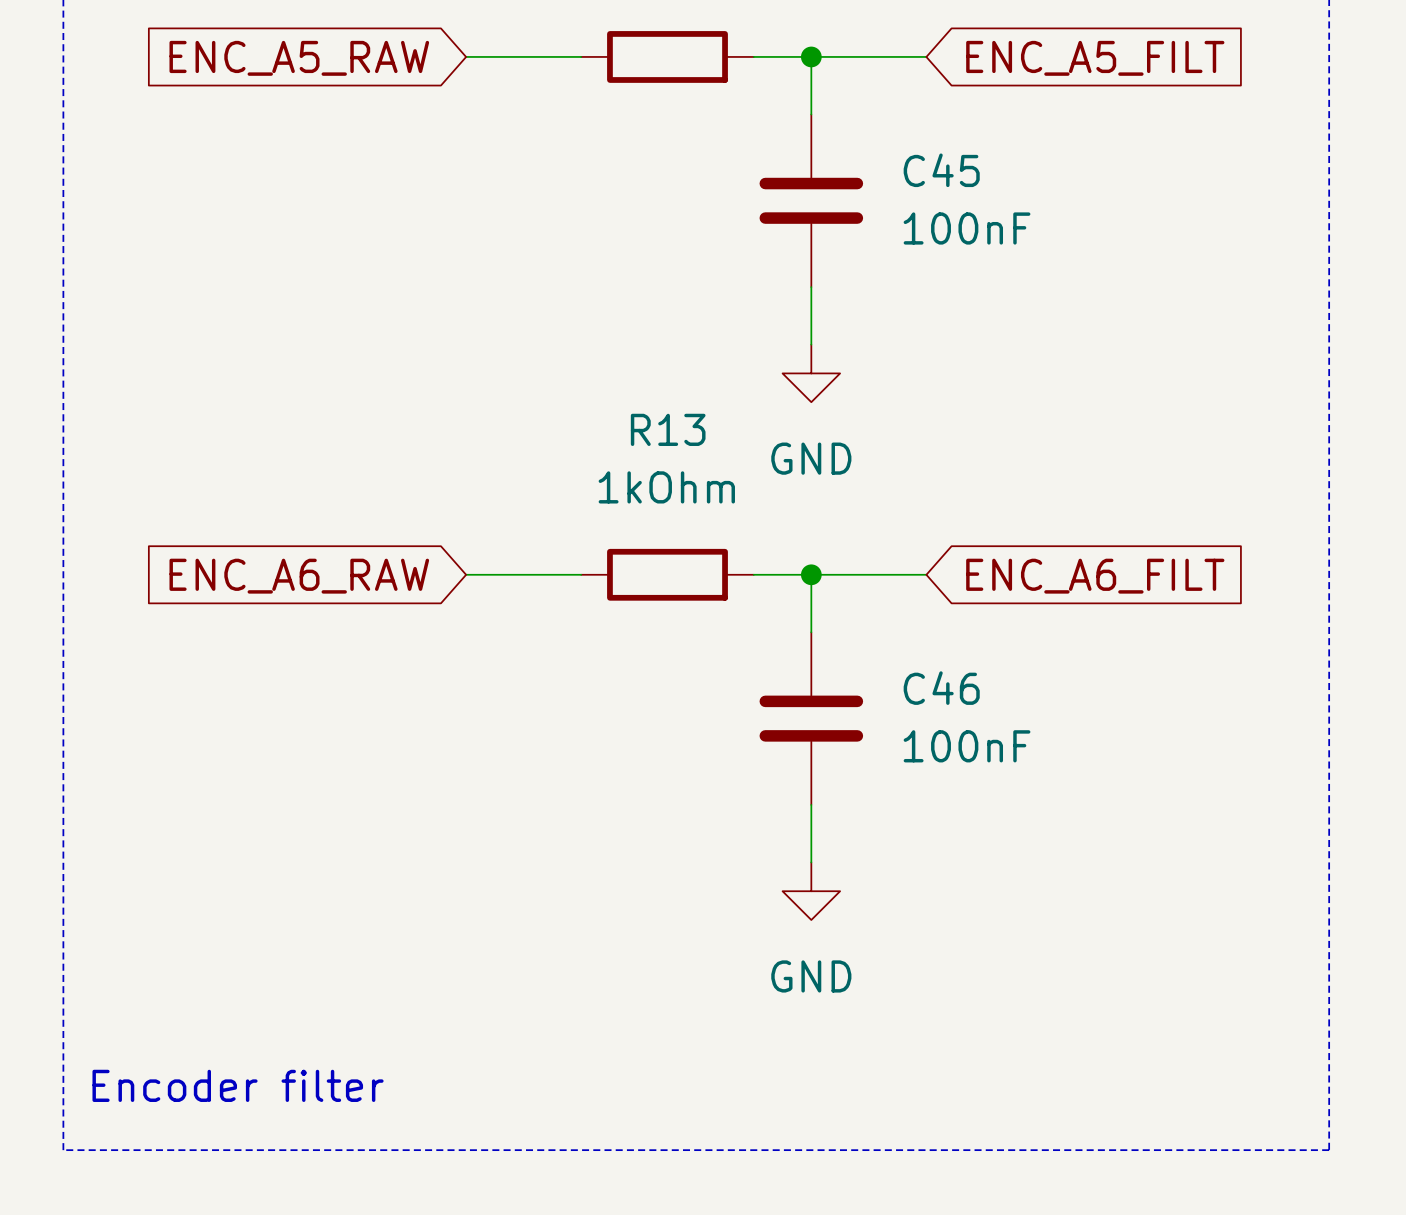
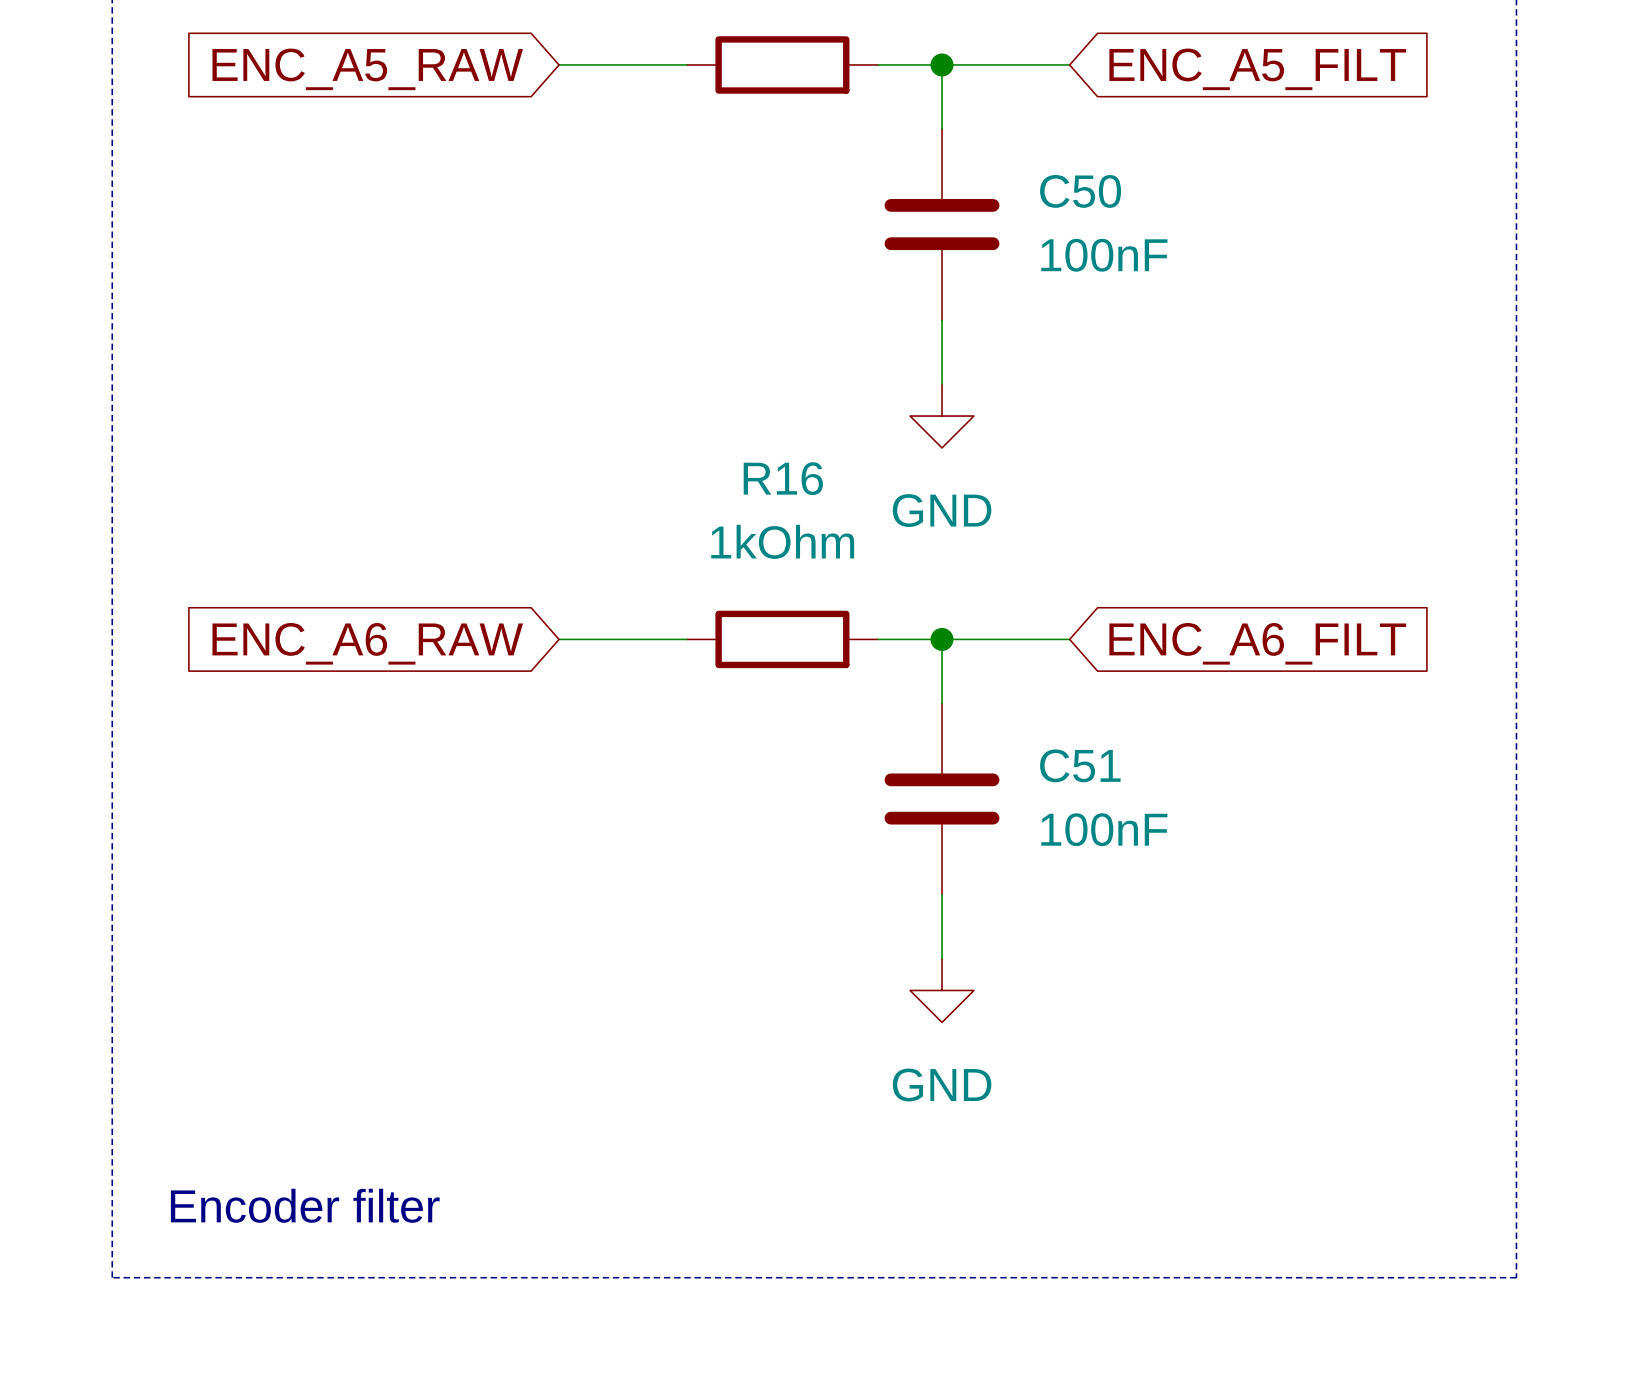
C45 name: C45 (941, 170) -> C50 (1080, 191)
R13 name: R13 (668, 429) -> R16 (783, 478)
C46 name: C46 (941, 688) -> C51 (1080, 765)

